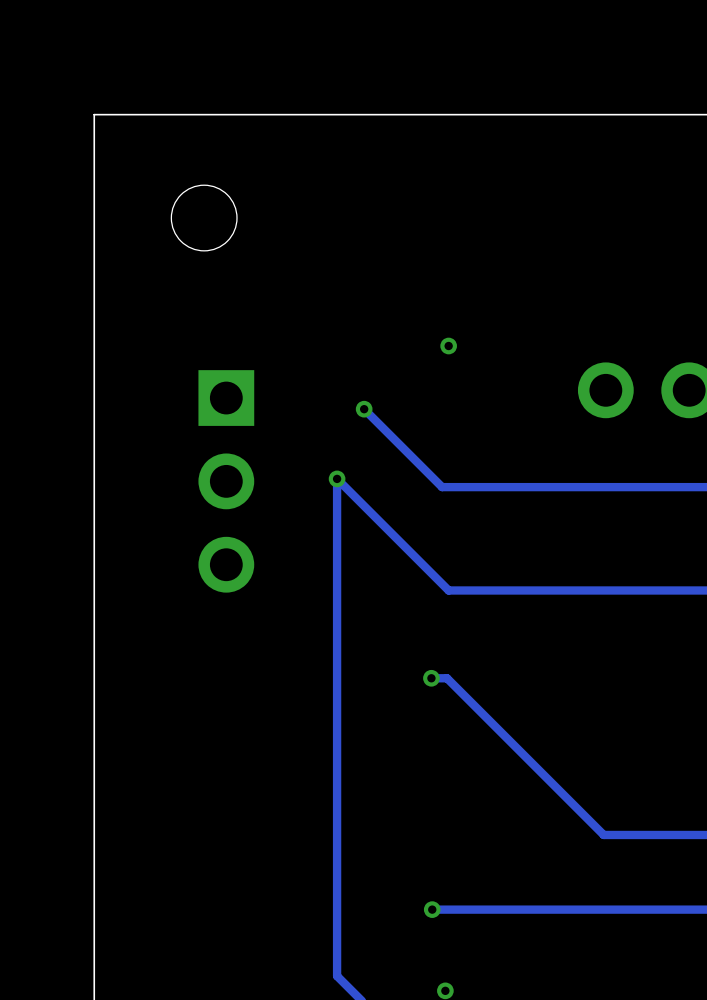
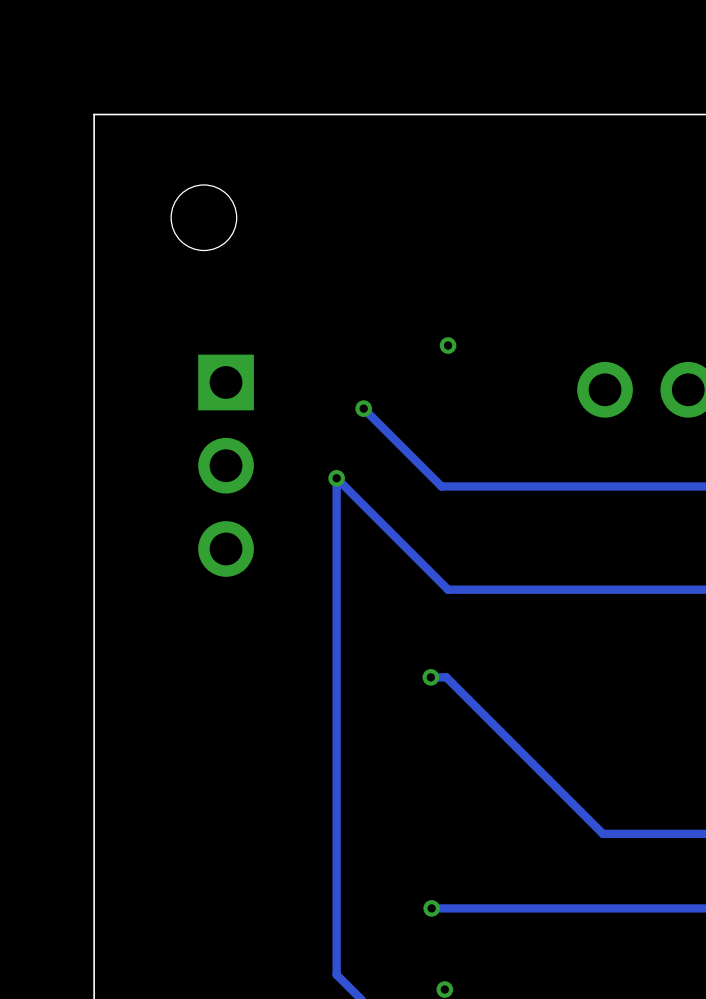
part position: (226, 481) -> (226, 465)

